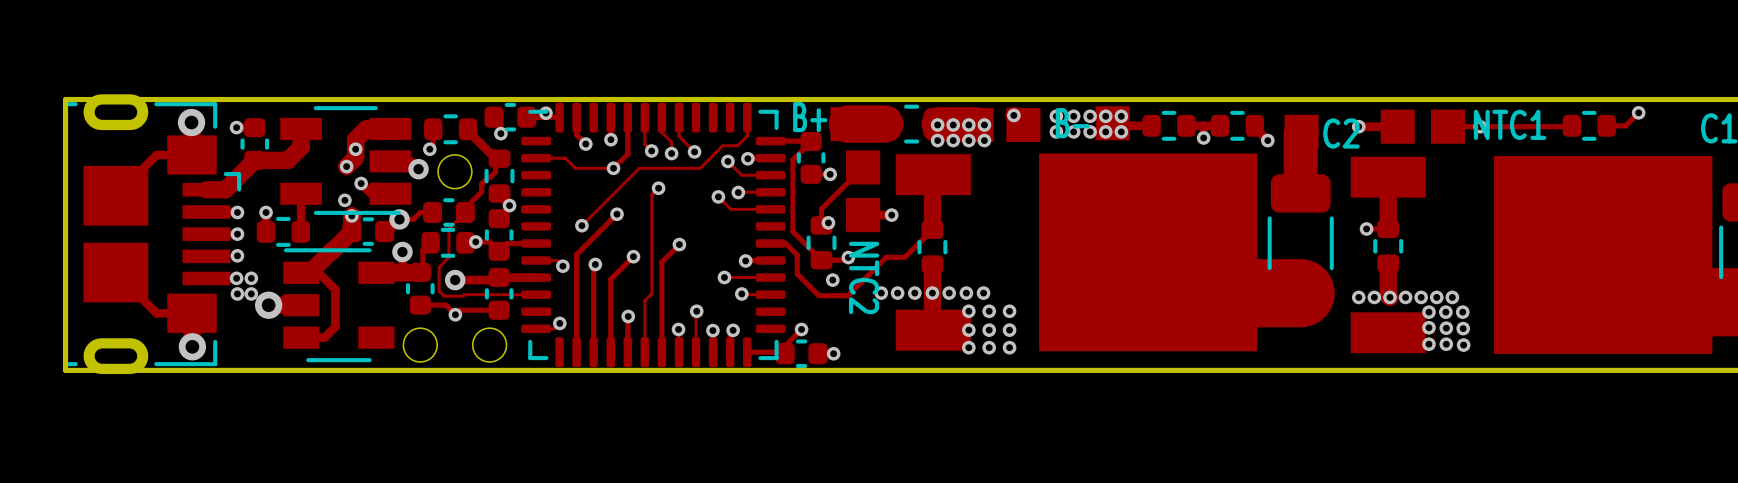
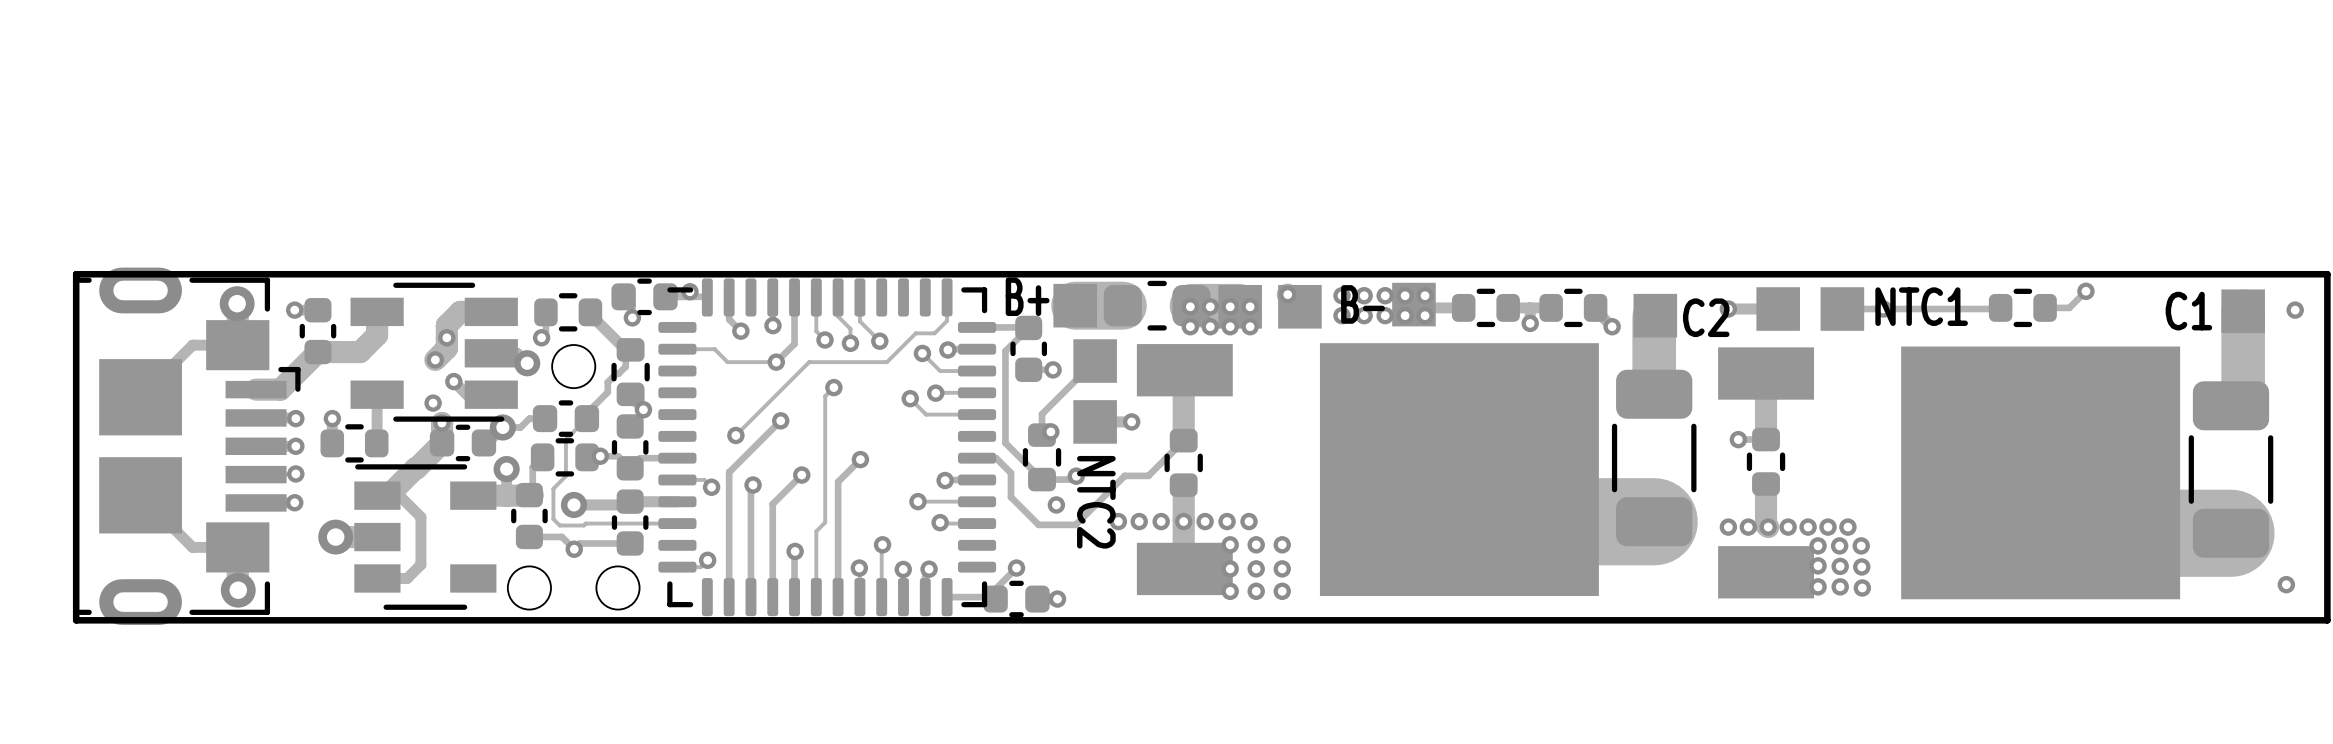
via: (251, 278) -> none
via: (237, 293) -> none
via: (251, 293) -> none

